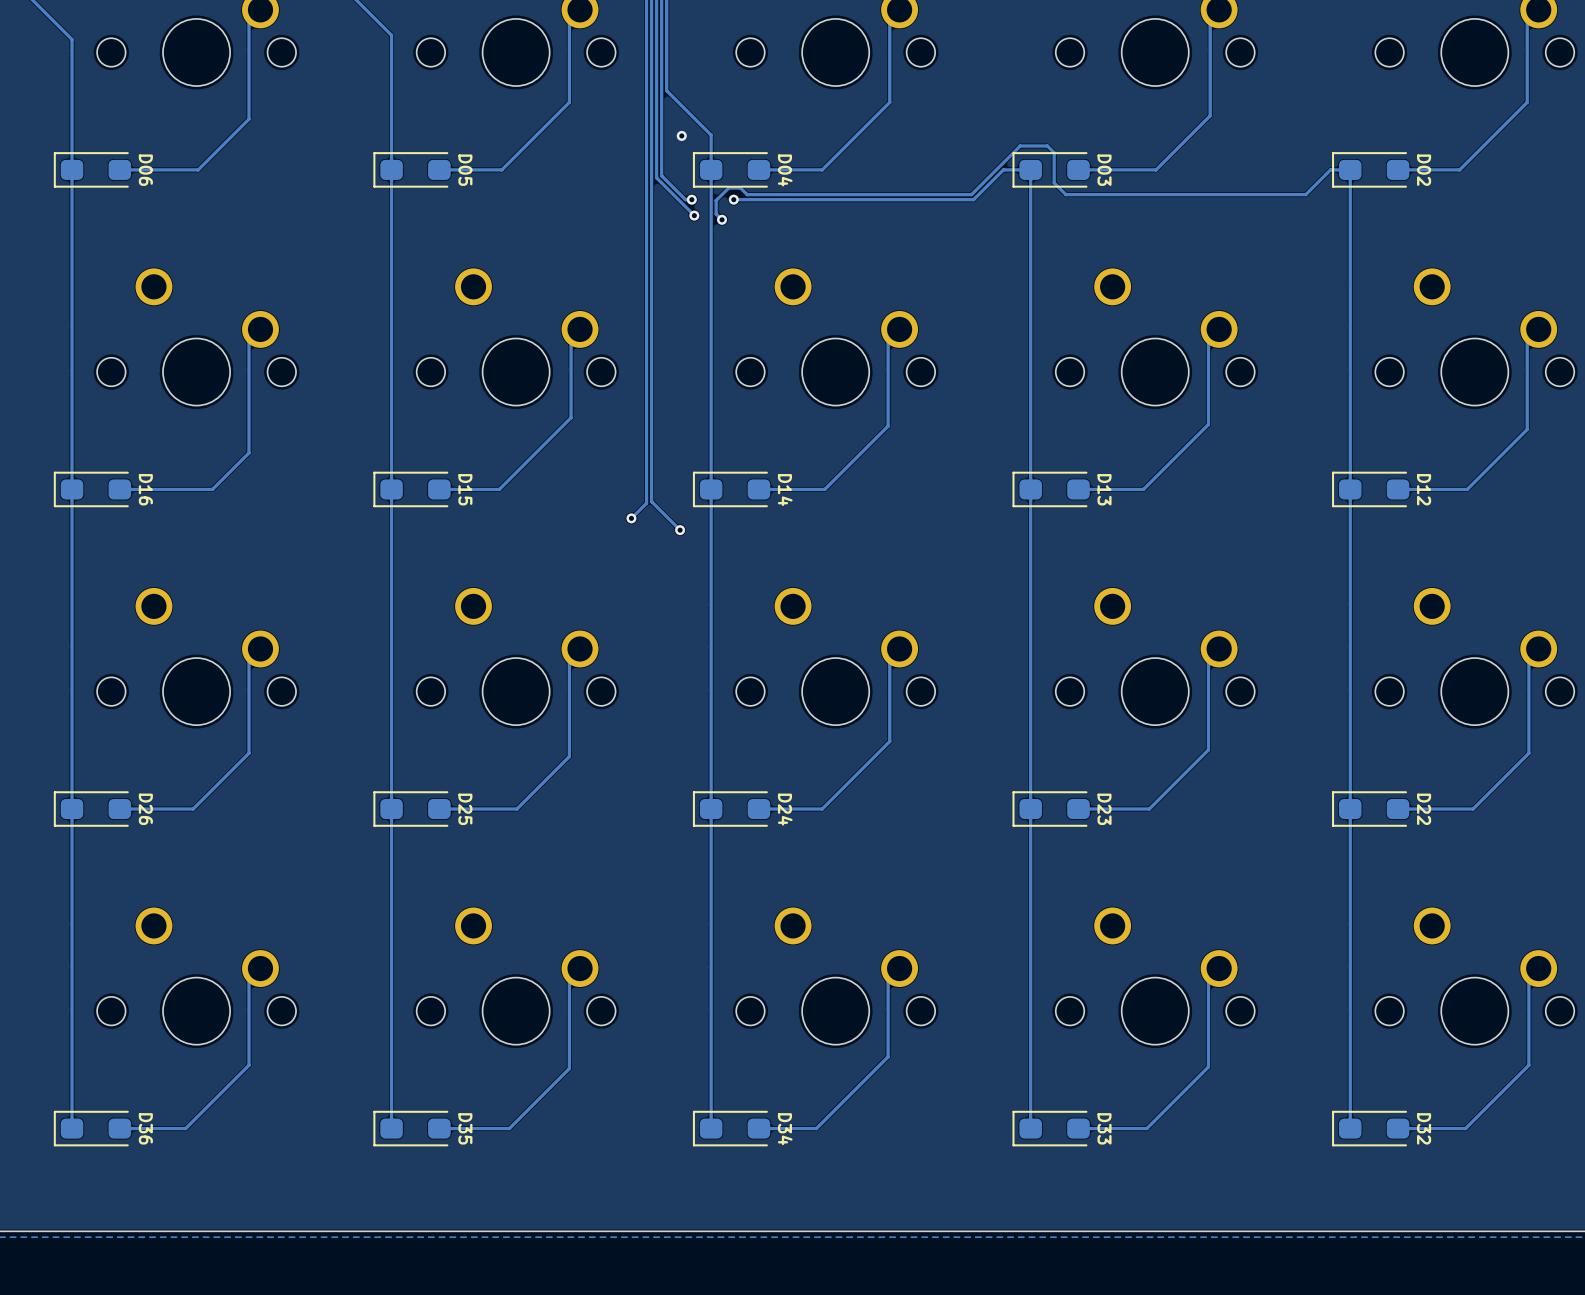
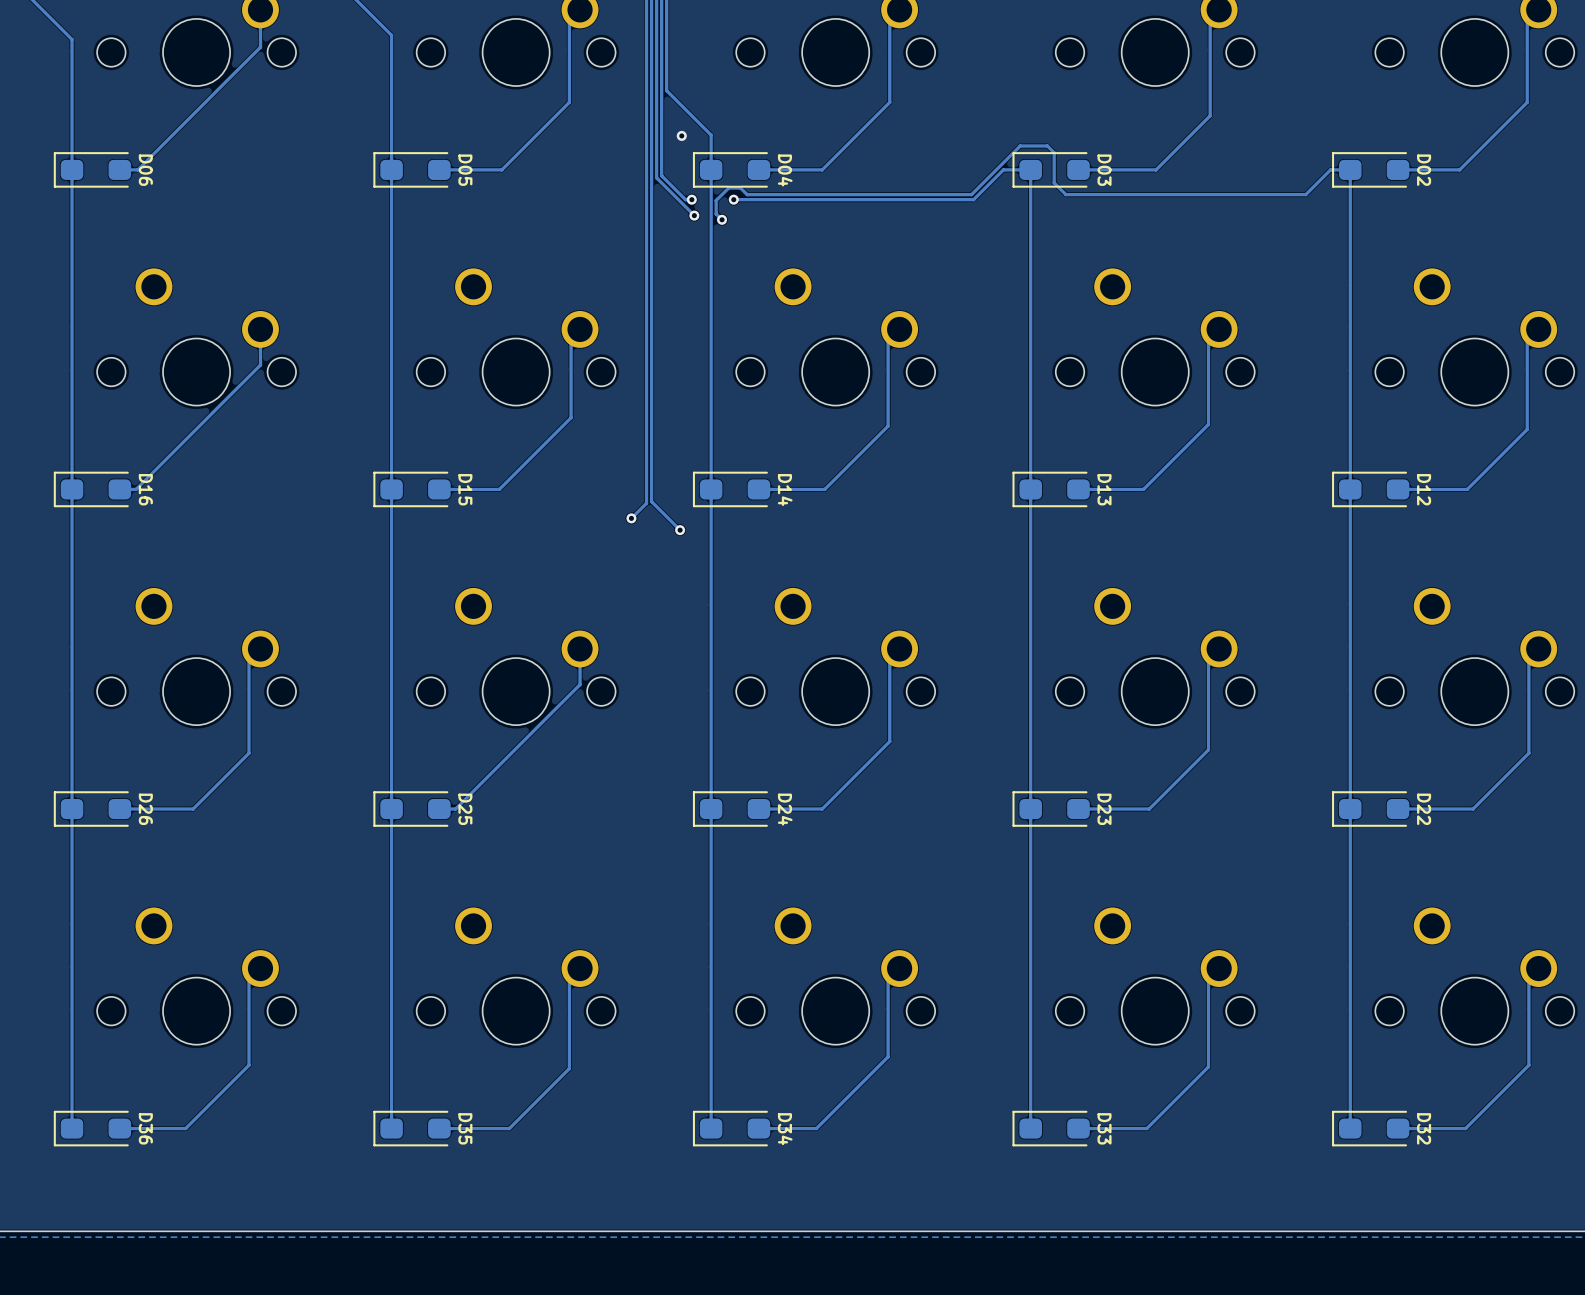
track: (248, 21) (248, 119) (198, 169) (137, 169) -> (260, 9) (260, 47) (137, 169)
track: (248, 340) (248, 452) (212, 489) (136, 489) -> (260, 329) (260, 365) (136, 489)
track: (569, 659) (569, 756) (516, 809) (455, 809) -> (580, 648) (580, 684) (455, 809)

